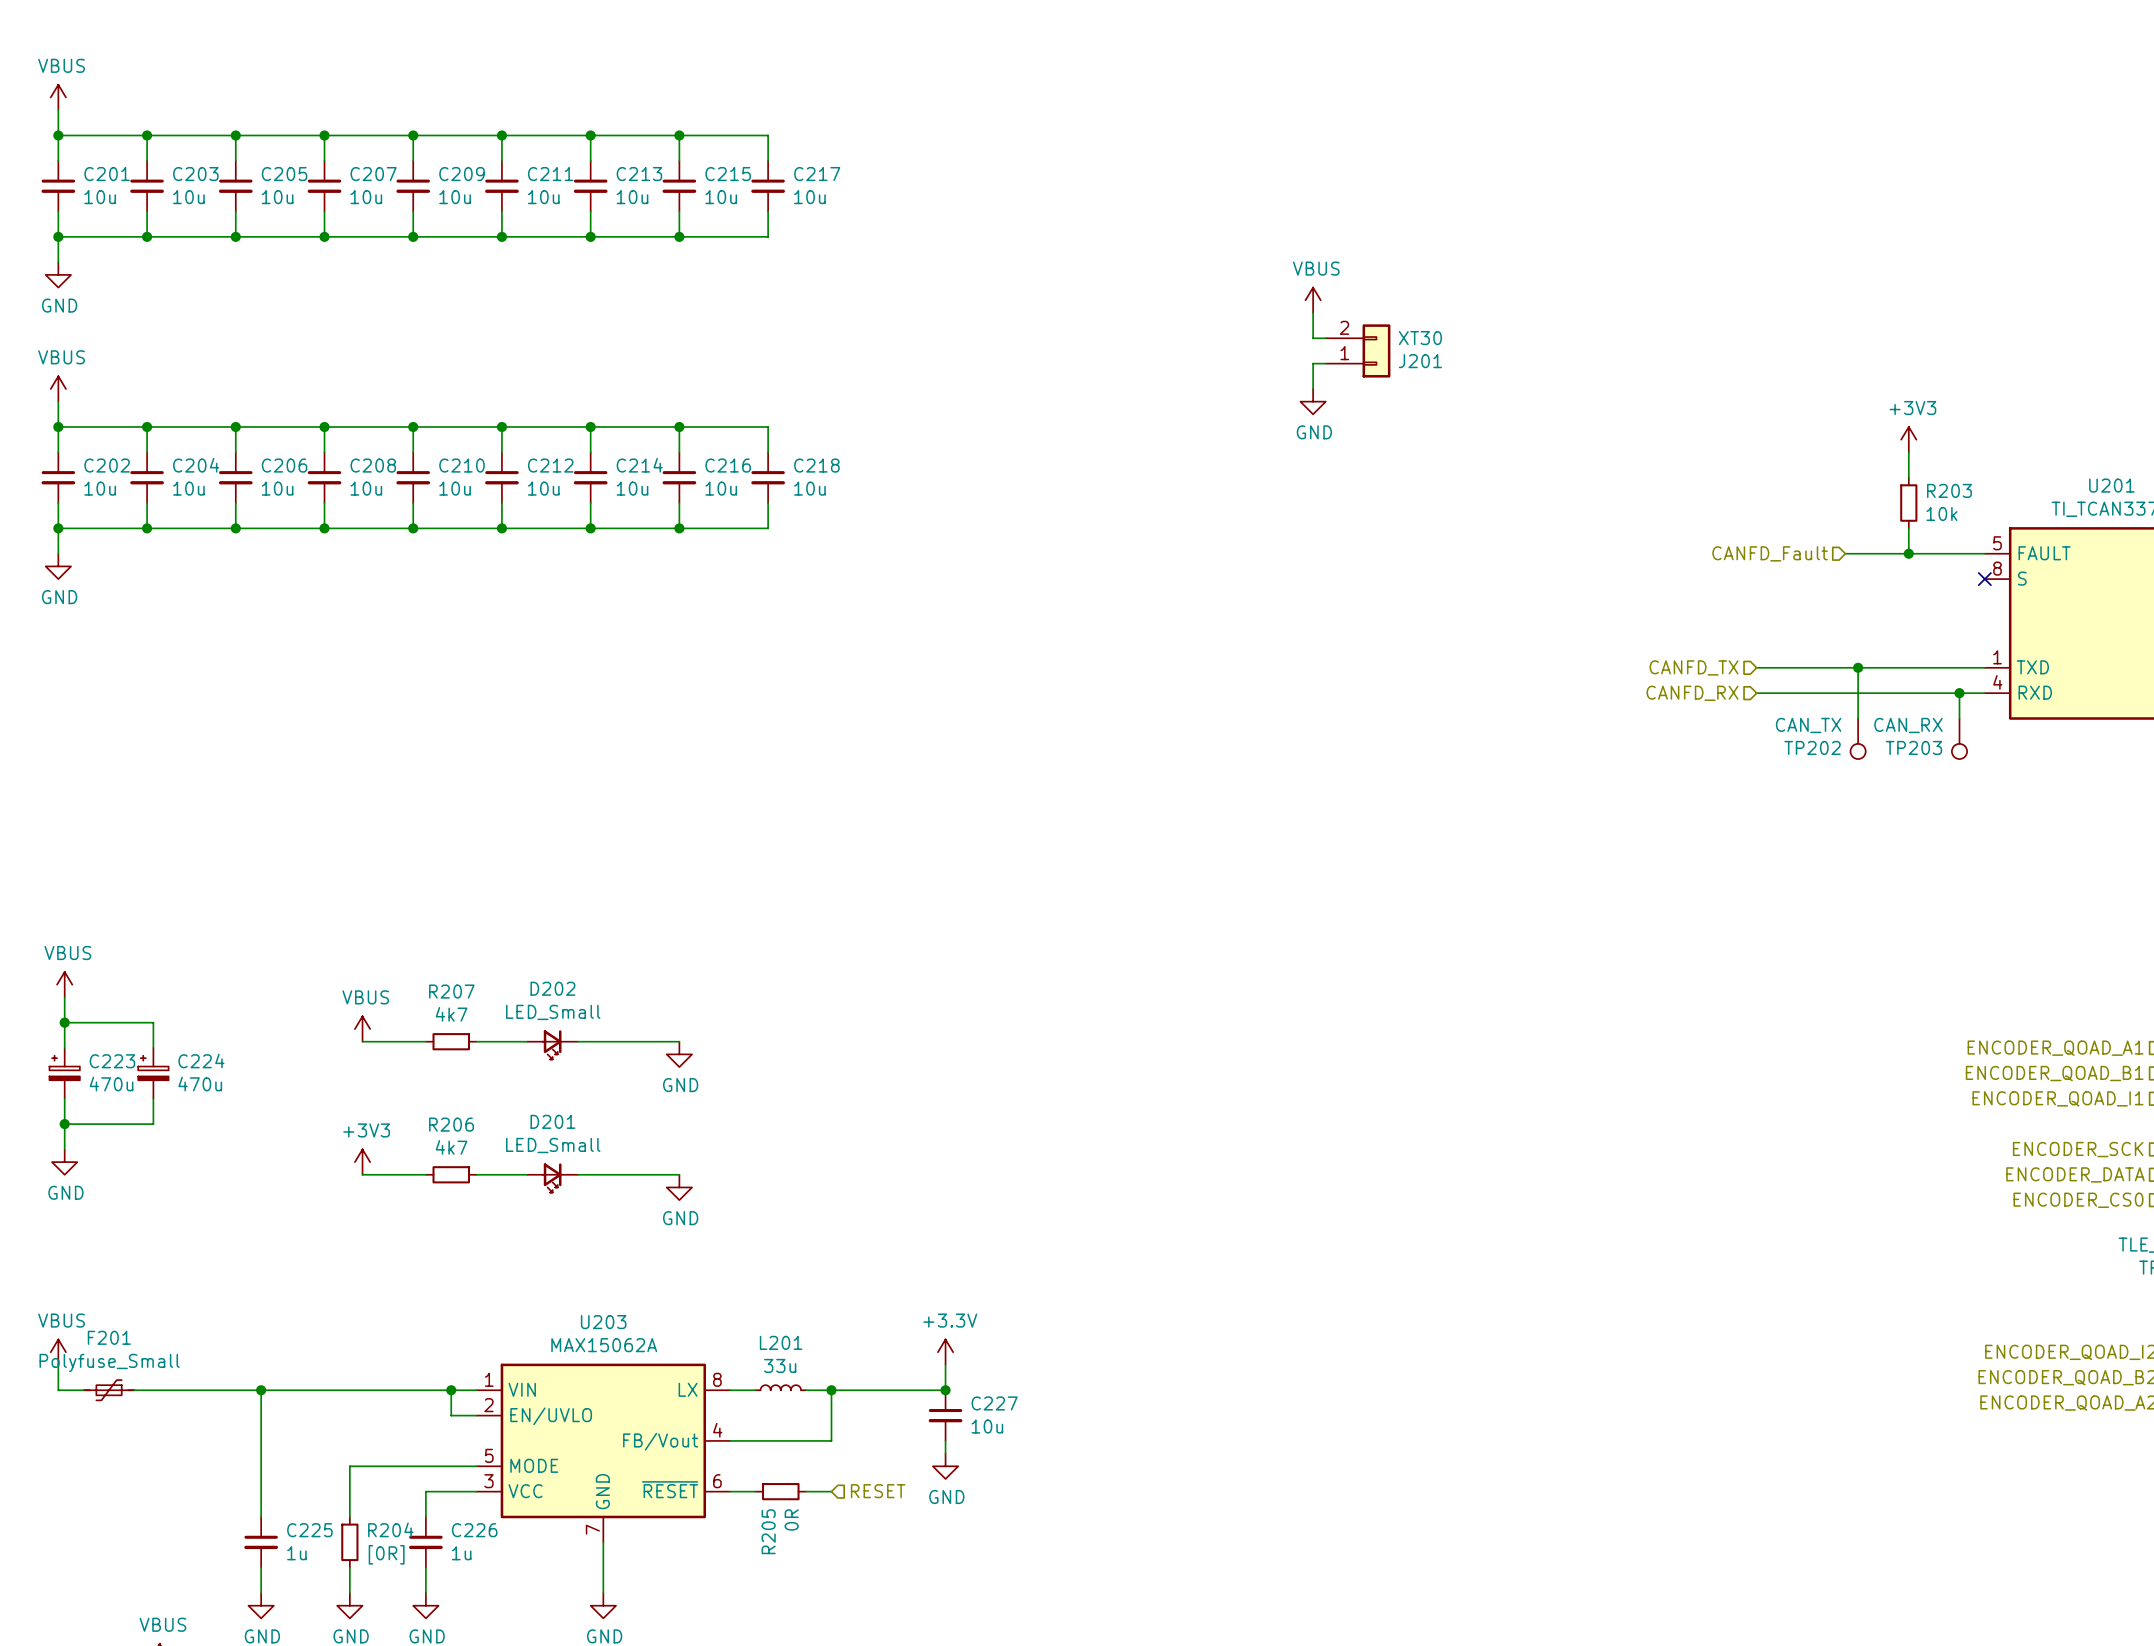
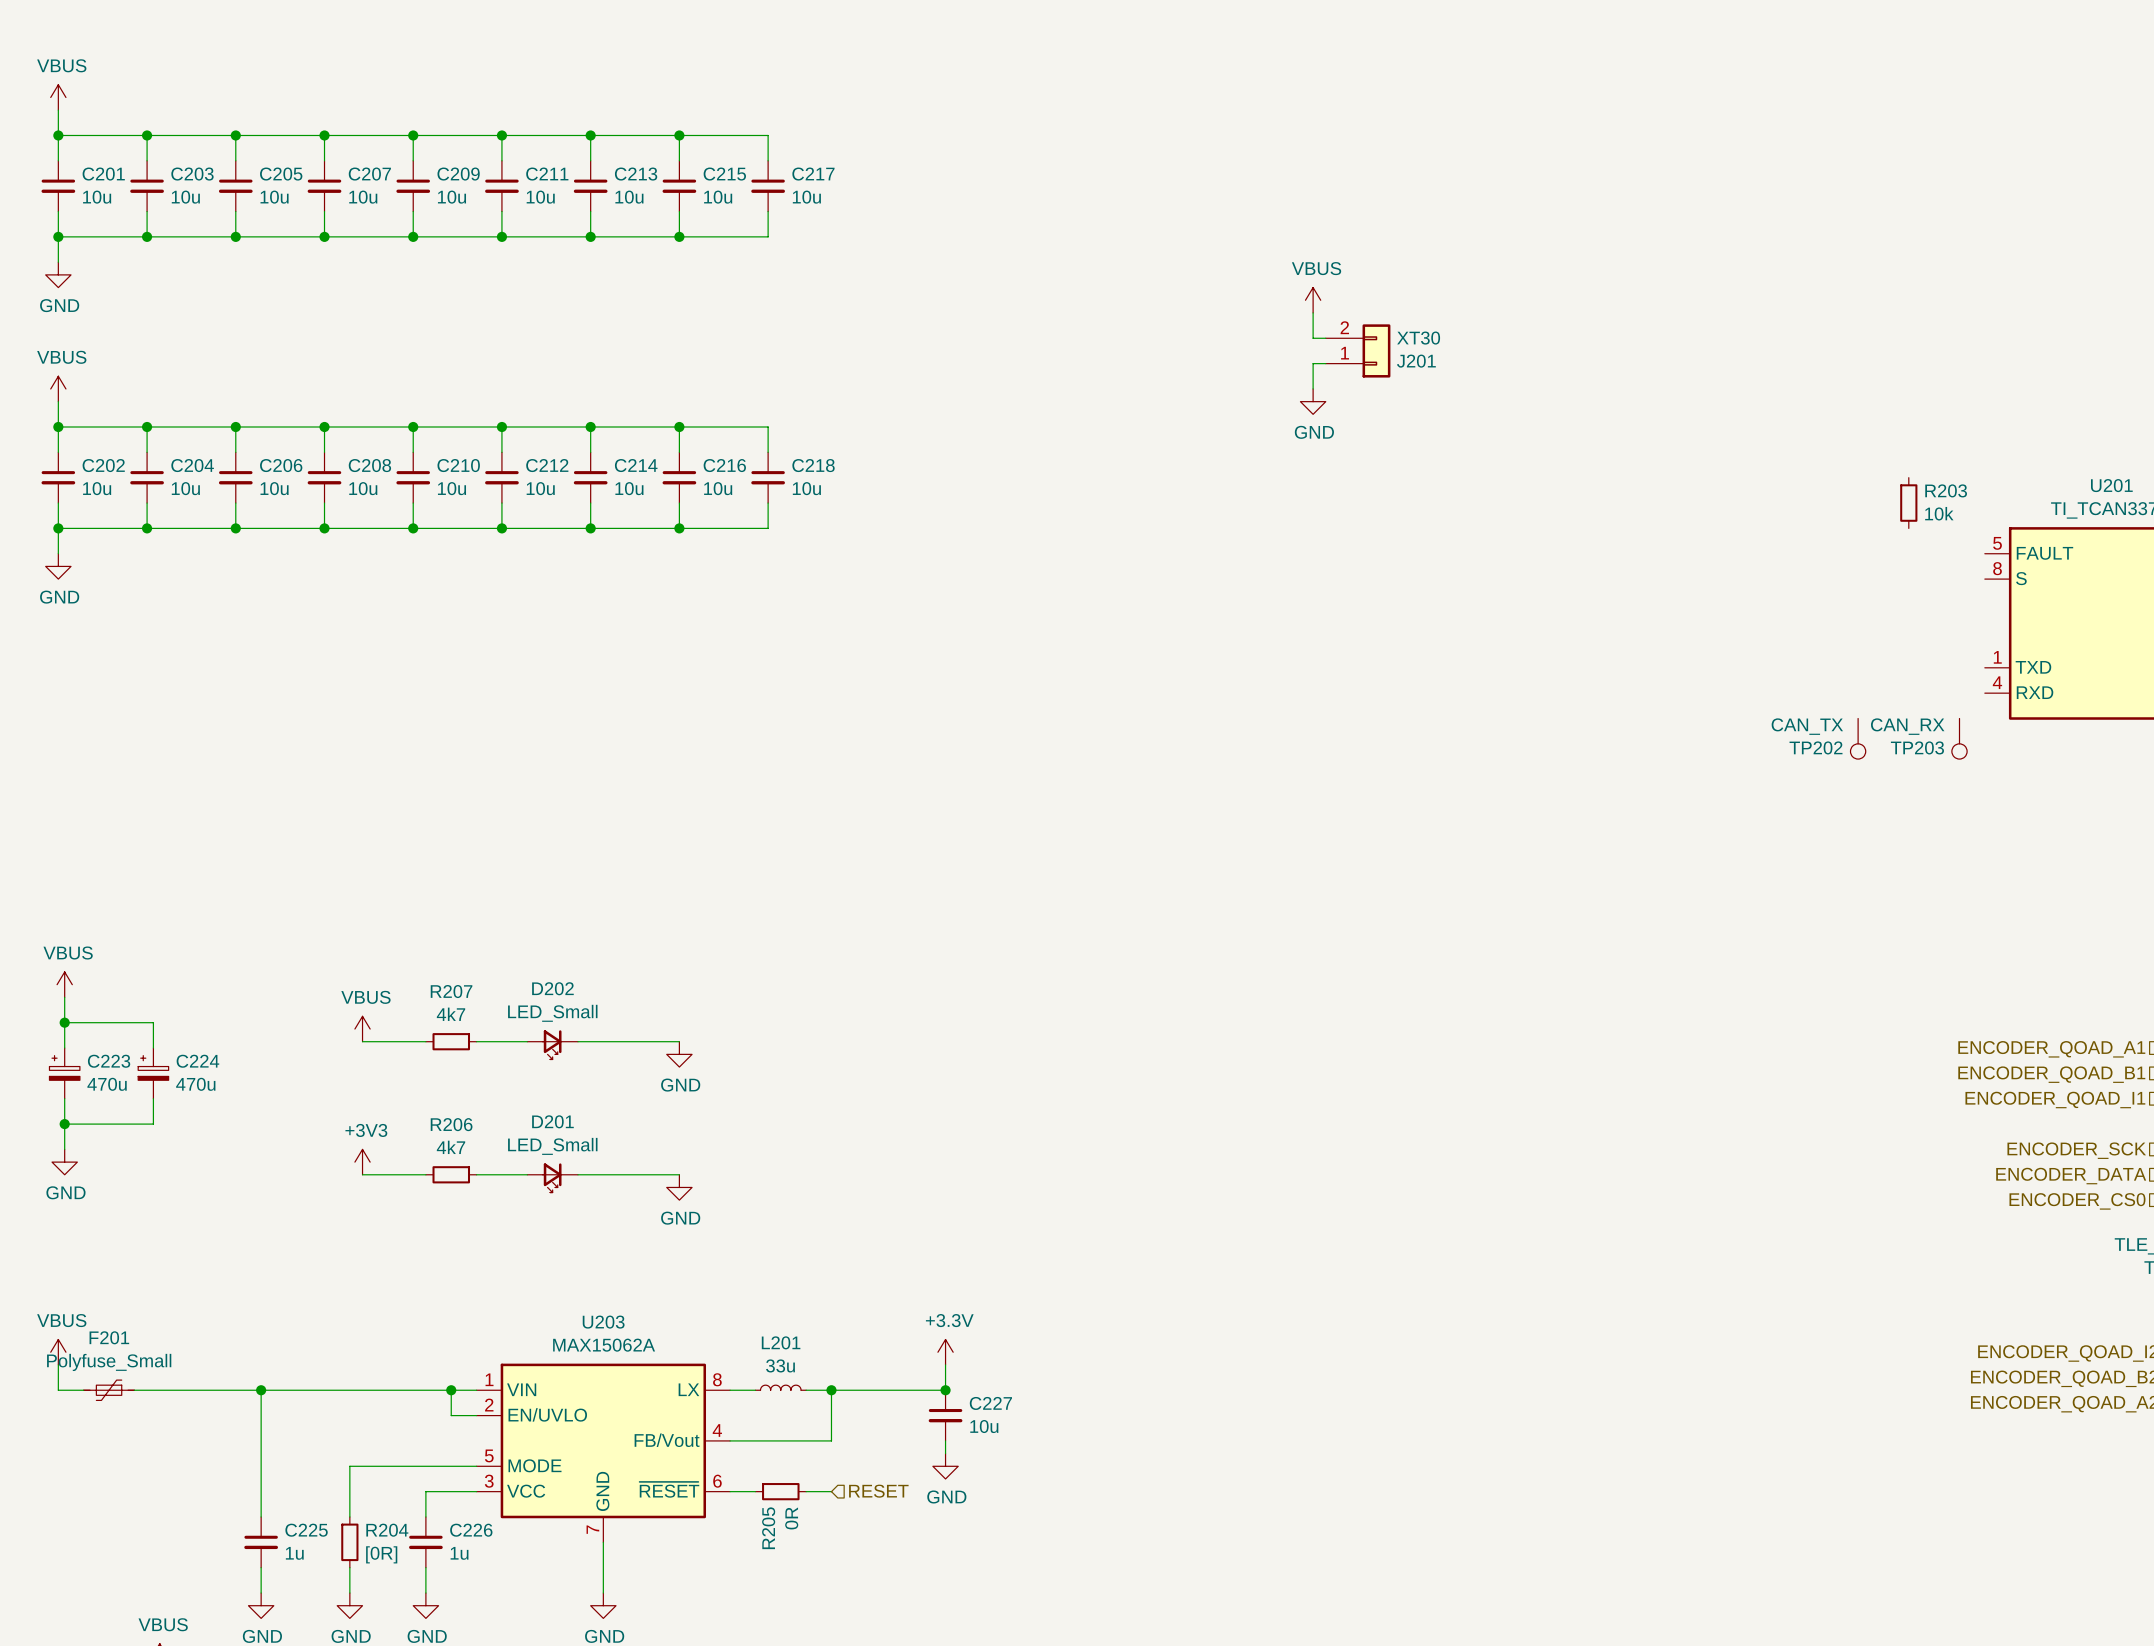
power symbol: +3V3 (1908, 439) -> none
wire: (1908, 452) (1908, 477) -> none
wire: (1908, 528) (1908, 553) -> none
hierarchical label: CANFD_Fault (1770, 553) -> none
wire: (1845, 553) (1984, 553) -> none
junction: (1908, 553) -> none
no-connect mark: (1984, 579) -> none
hierarchical label: CANFD_TX (1694, 667) -> none
wire: (1756, 667) (1984, 667) -> none
wire: (1858, 667) (1858, 718) -> none
junction: (1858, 667) -> none
hierarchical label: CANFD_RX (1692, 693) -> none
wire: (1756, 693) (1984, 693) -> none
wire: (1959, 693) (1959, 718) -> none
junction: (1959, 693) -> none

